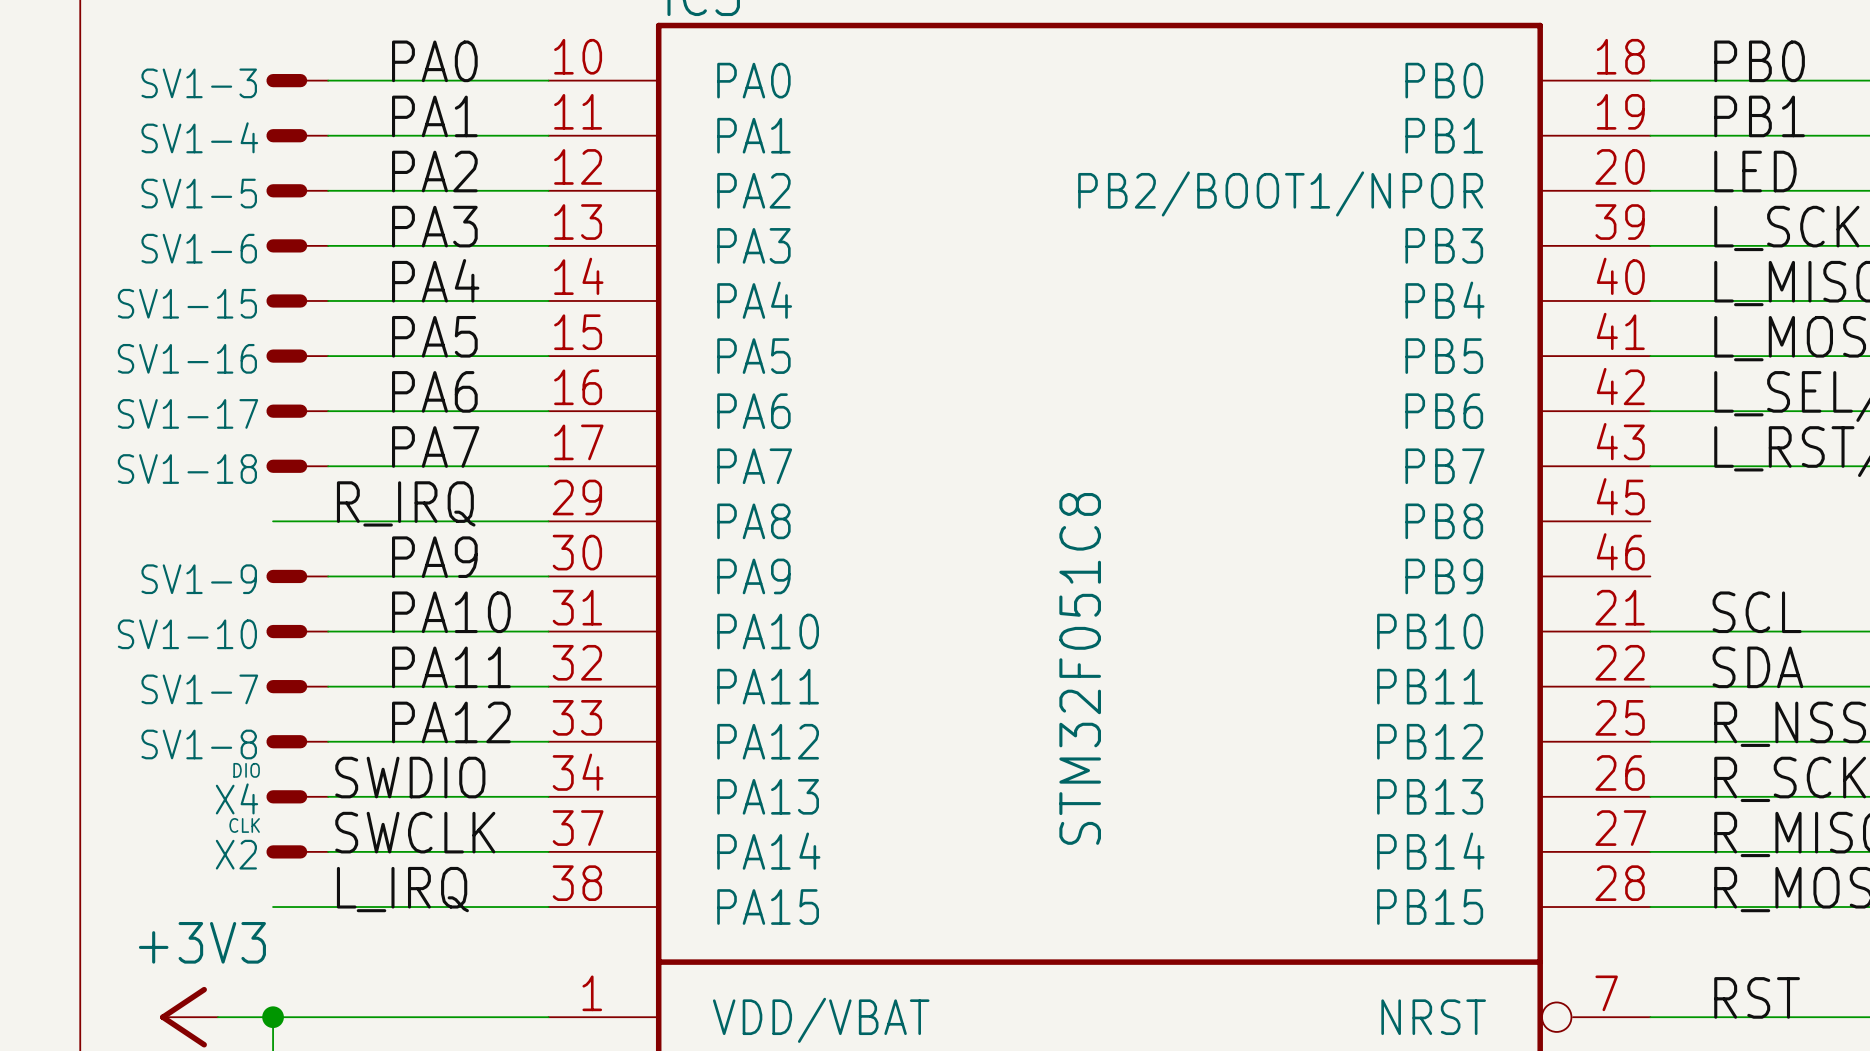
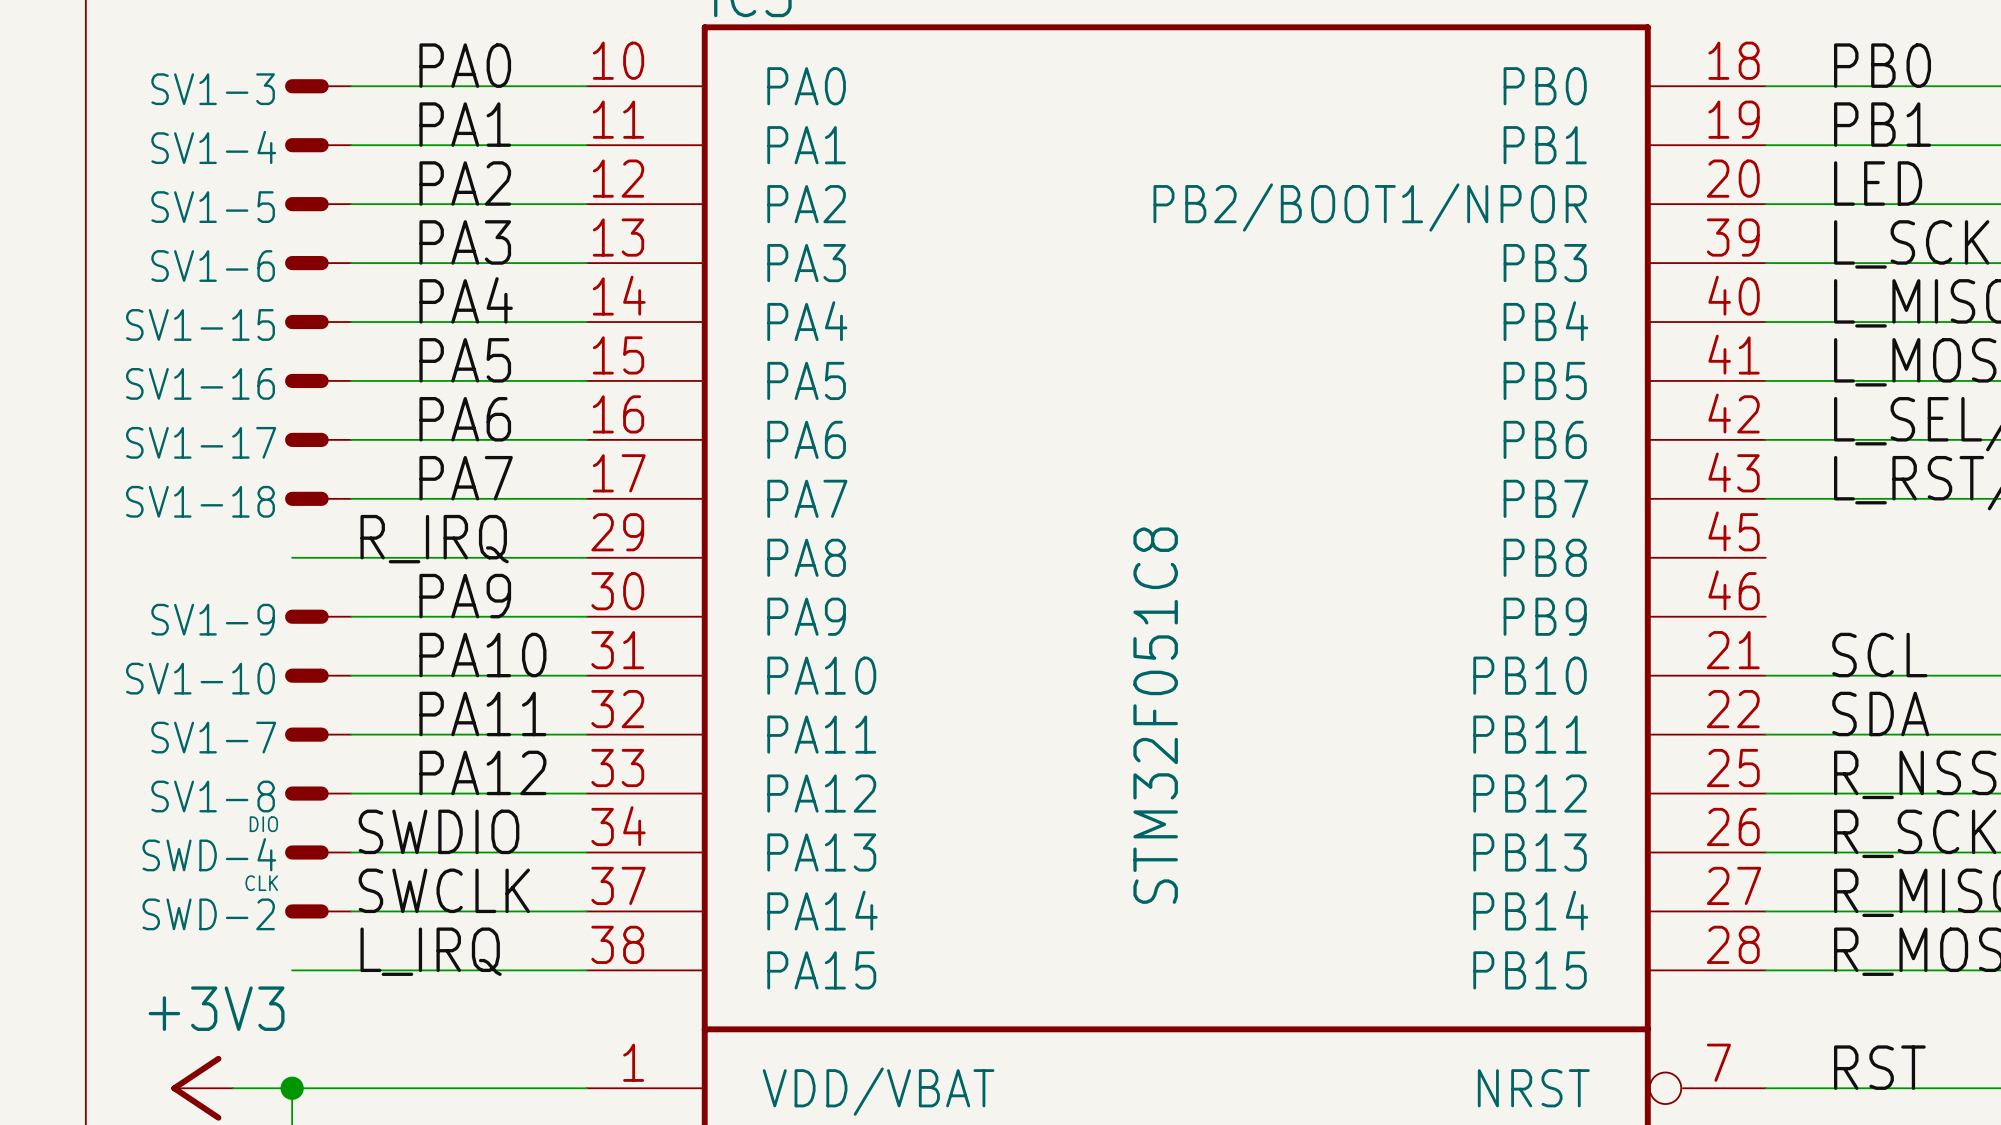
X4 name: X4 (236, 798) -> SWD-4 (209, 854)
X2 name: X2 (236, 854) -> SWD-2 (208, 914)

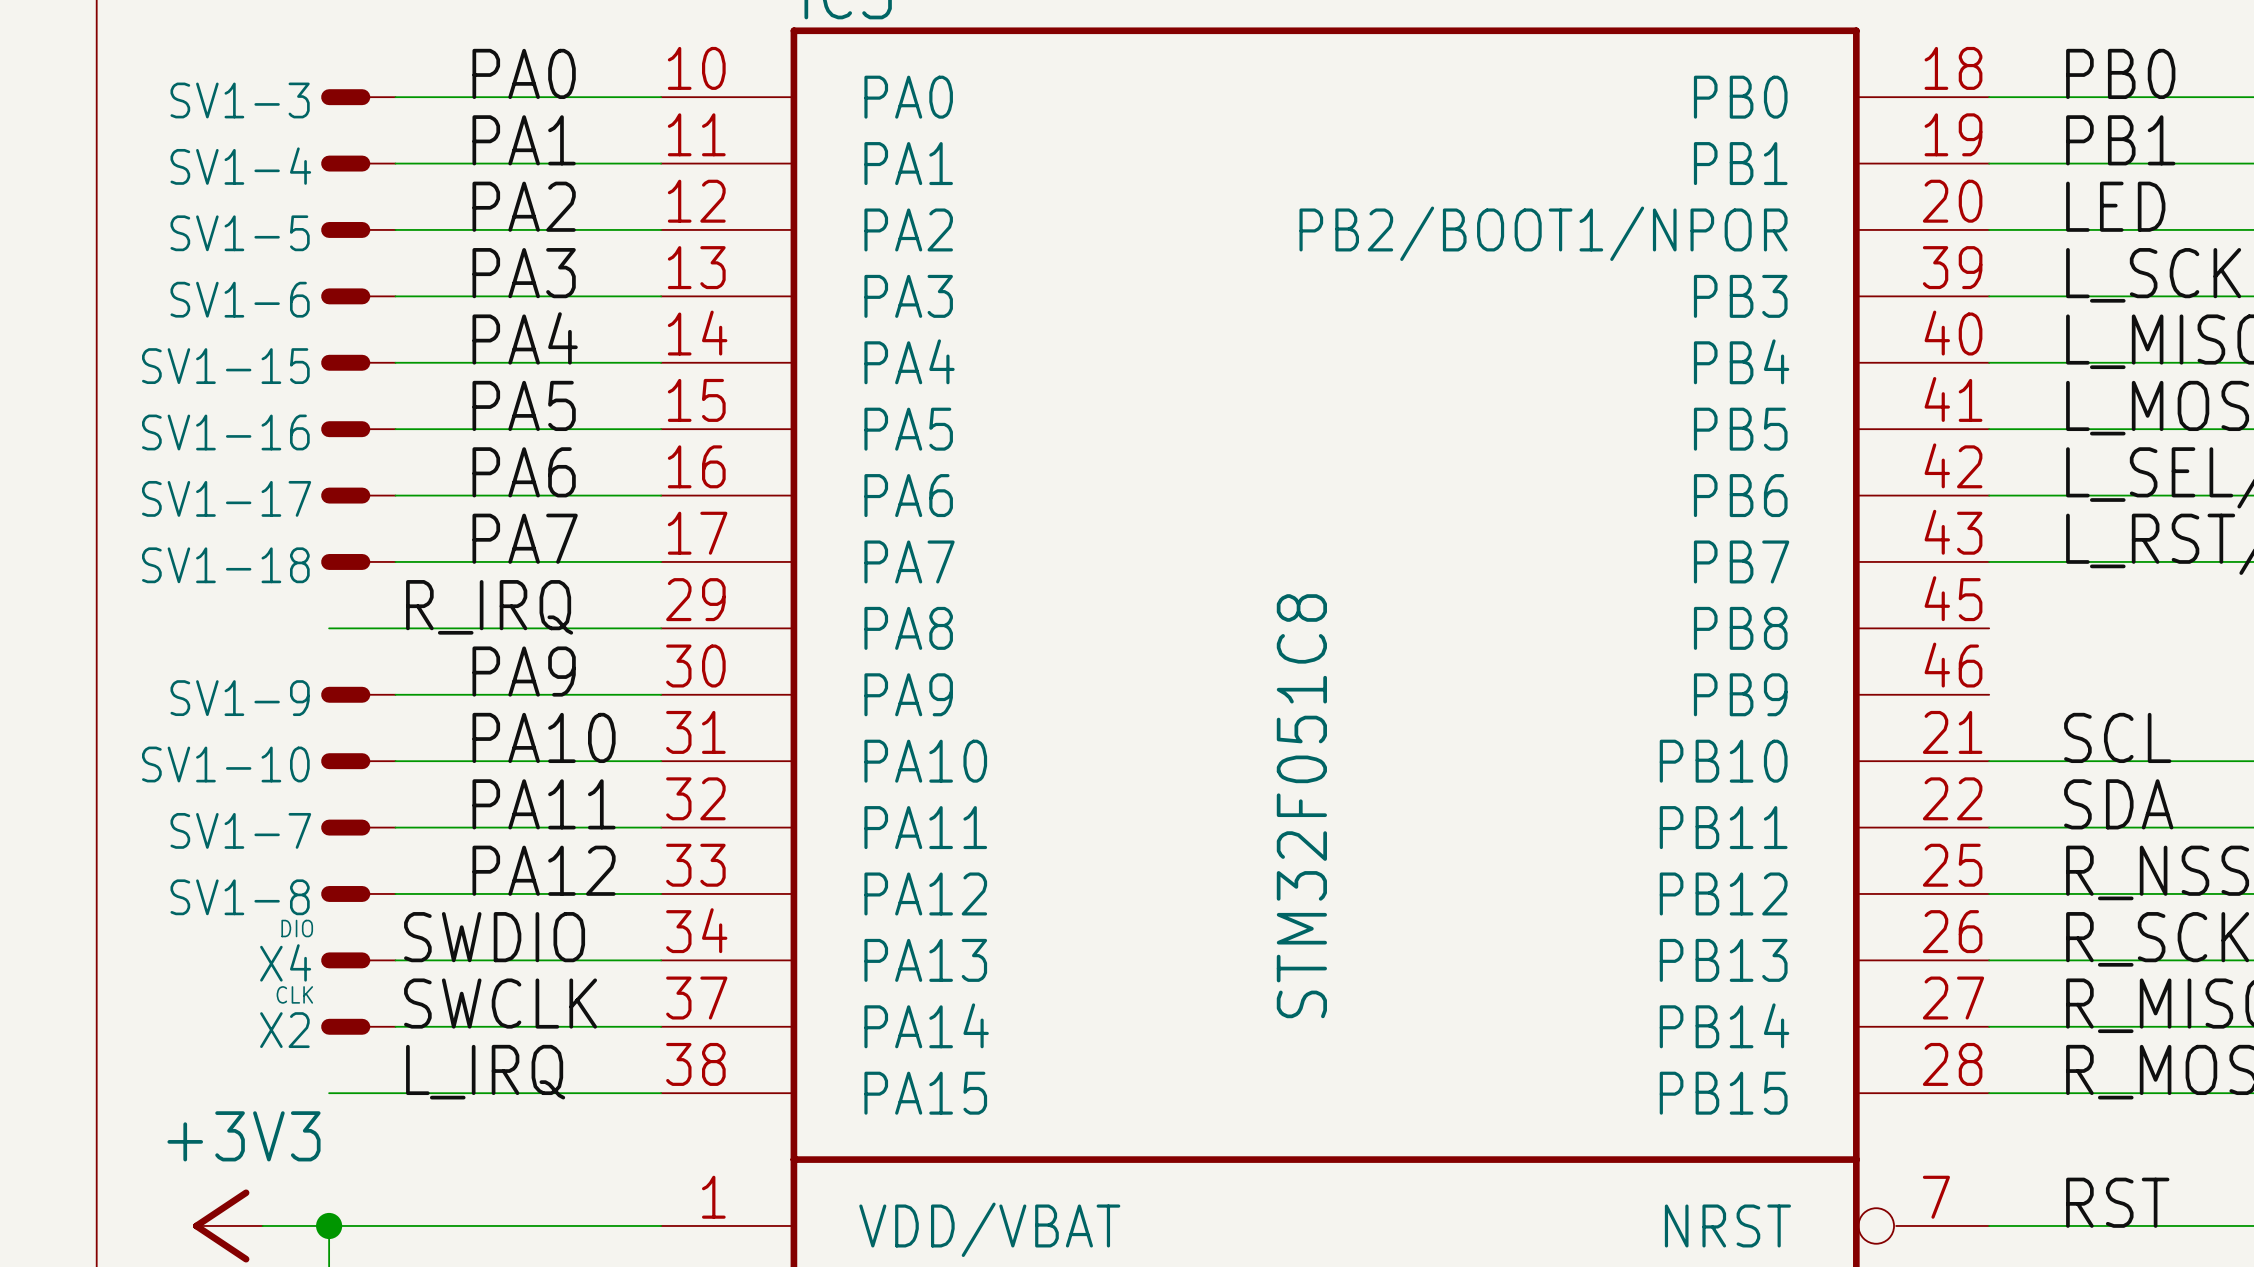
SWD-4 name: SWD-4 (209, 854) -> X4 (285, 962)
SWD-2 name: SWD-2 (208, 914) -> X2 (284, 1030)

